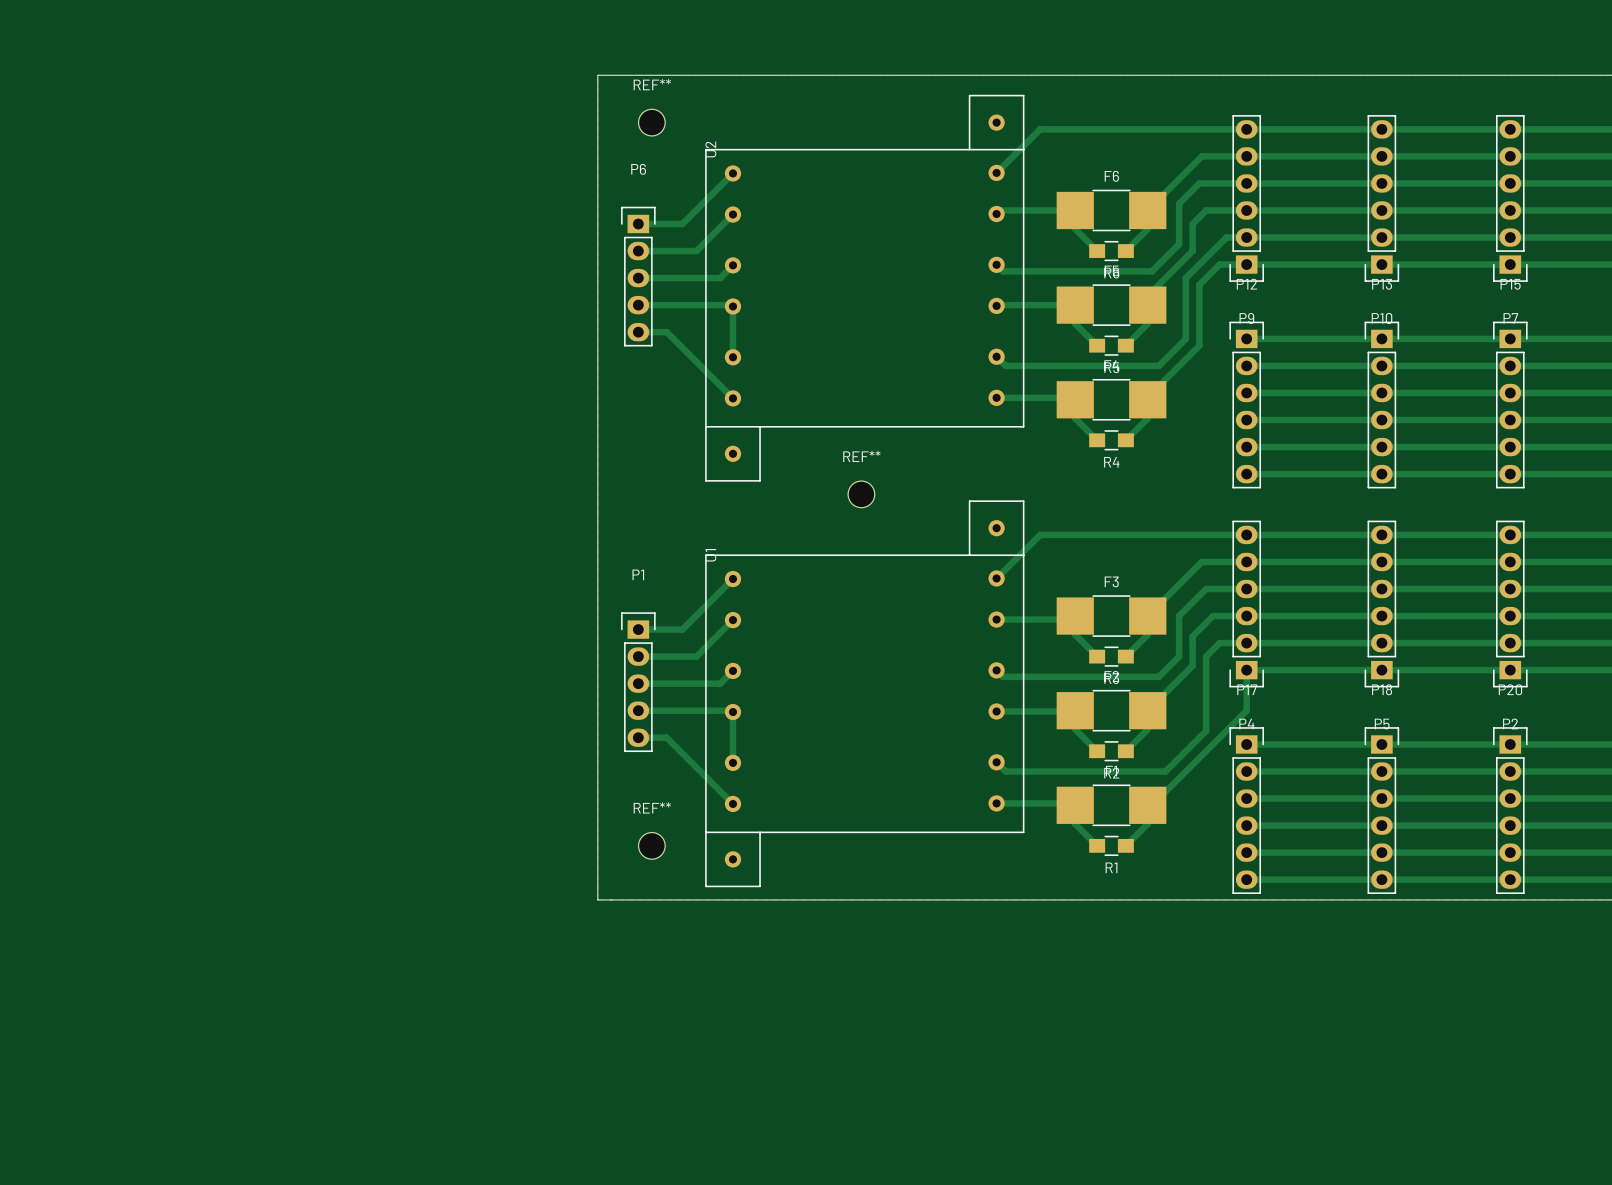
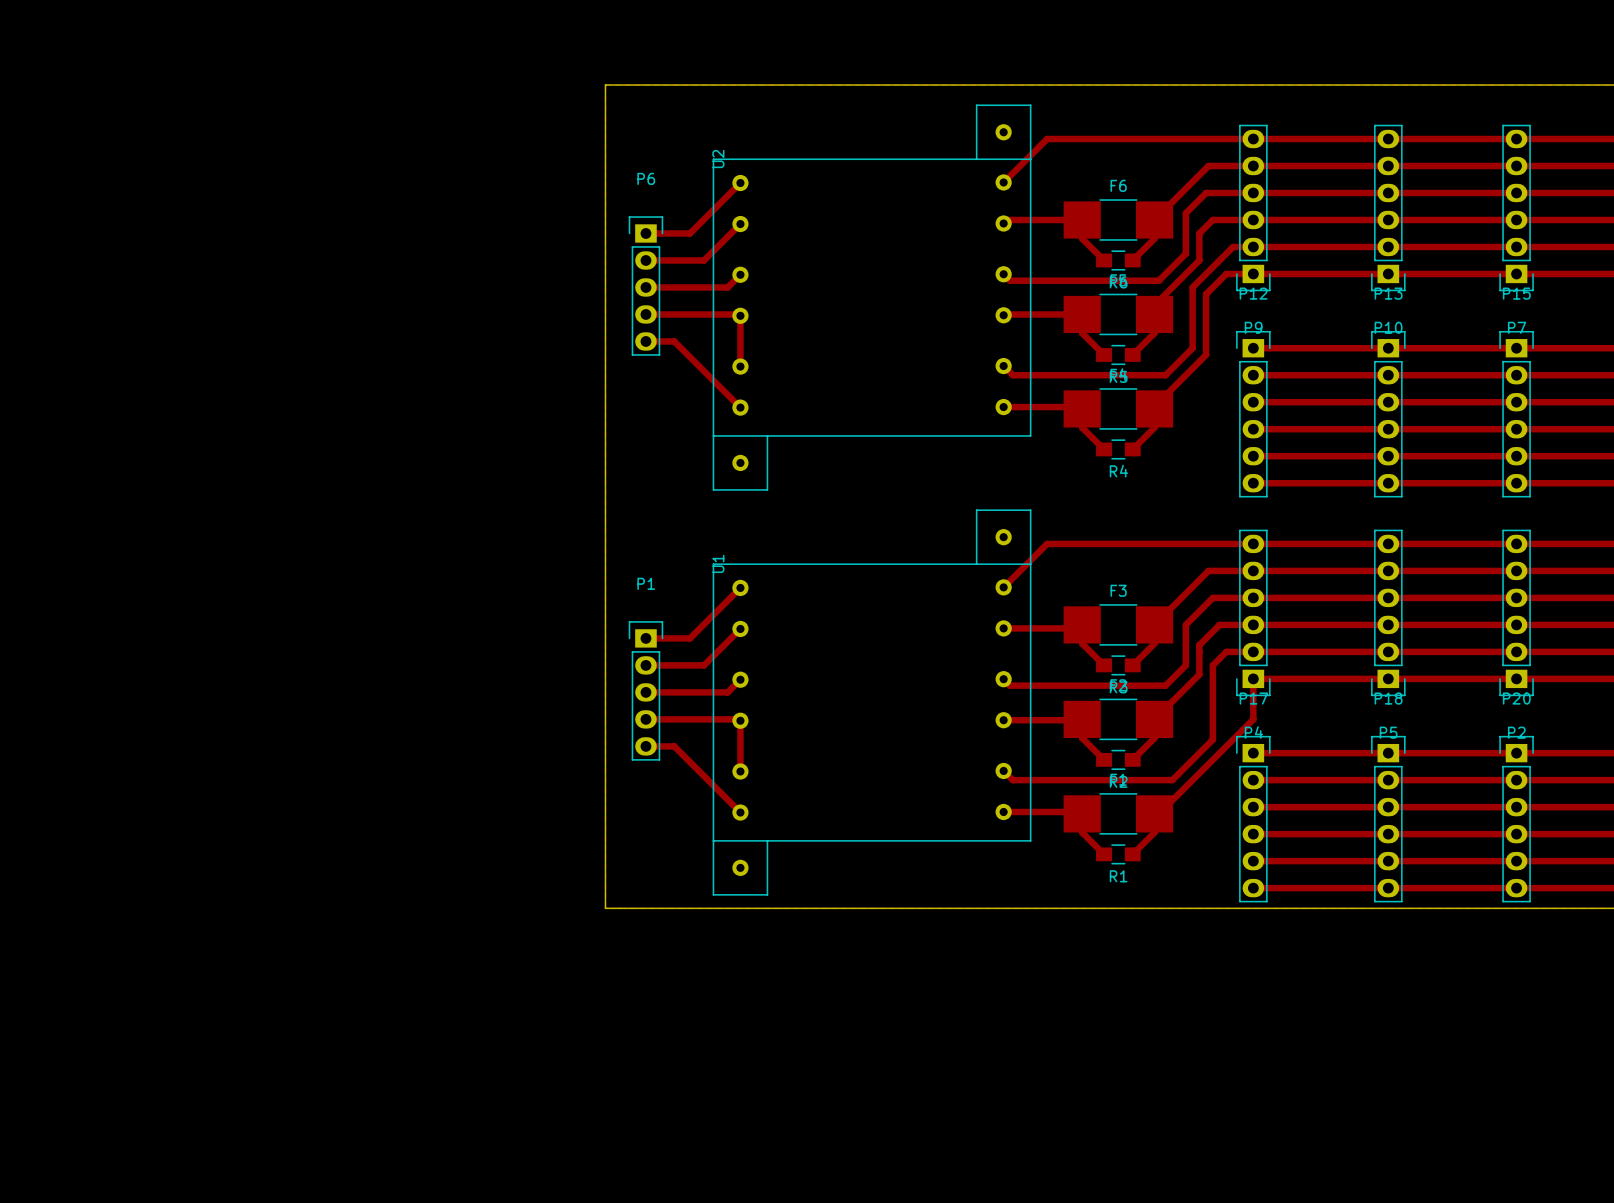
REF**: (651, 122) -> none
REF**: (861, 494) -> none
REF**: (651, 845) -> none

